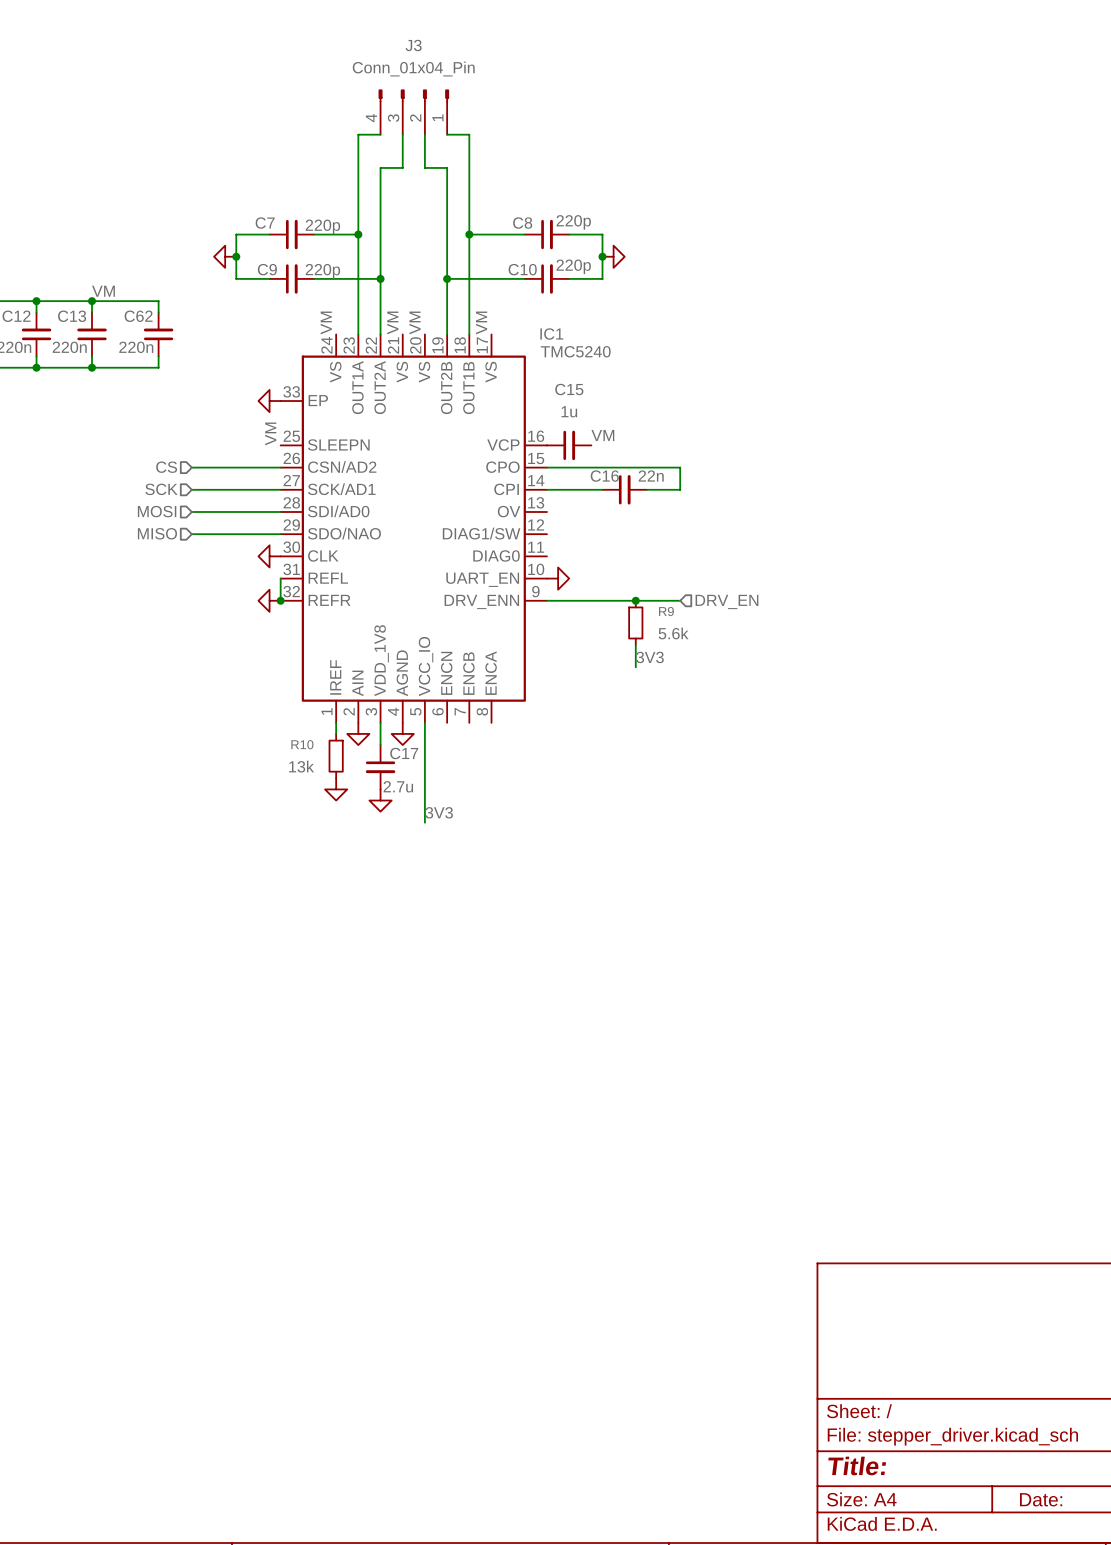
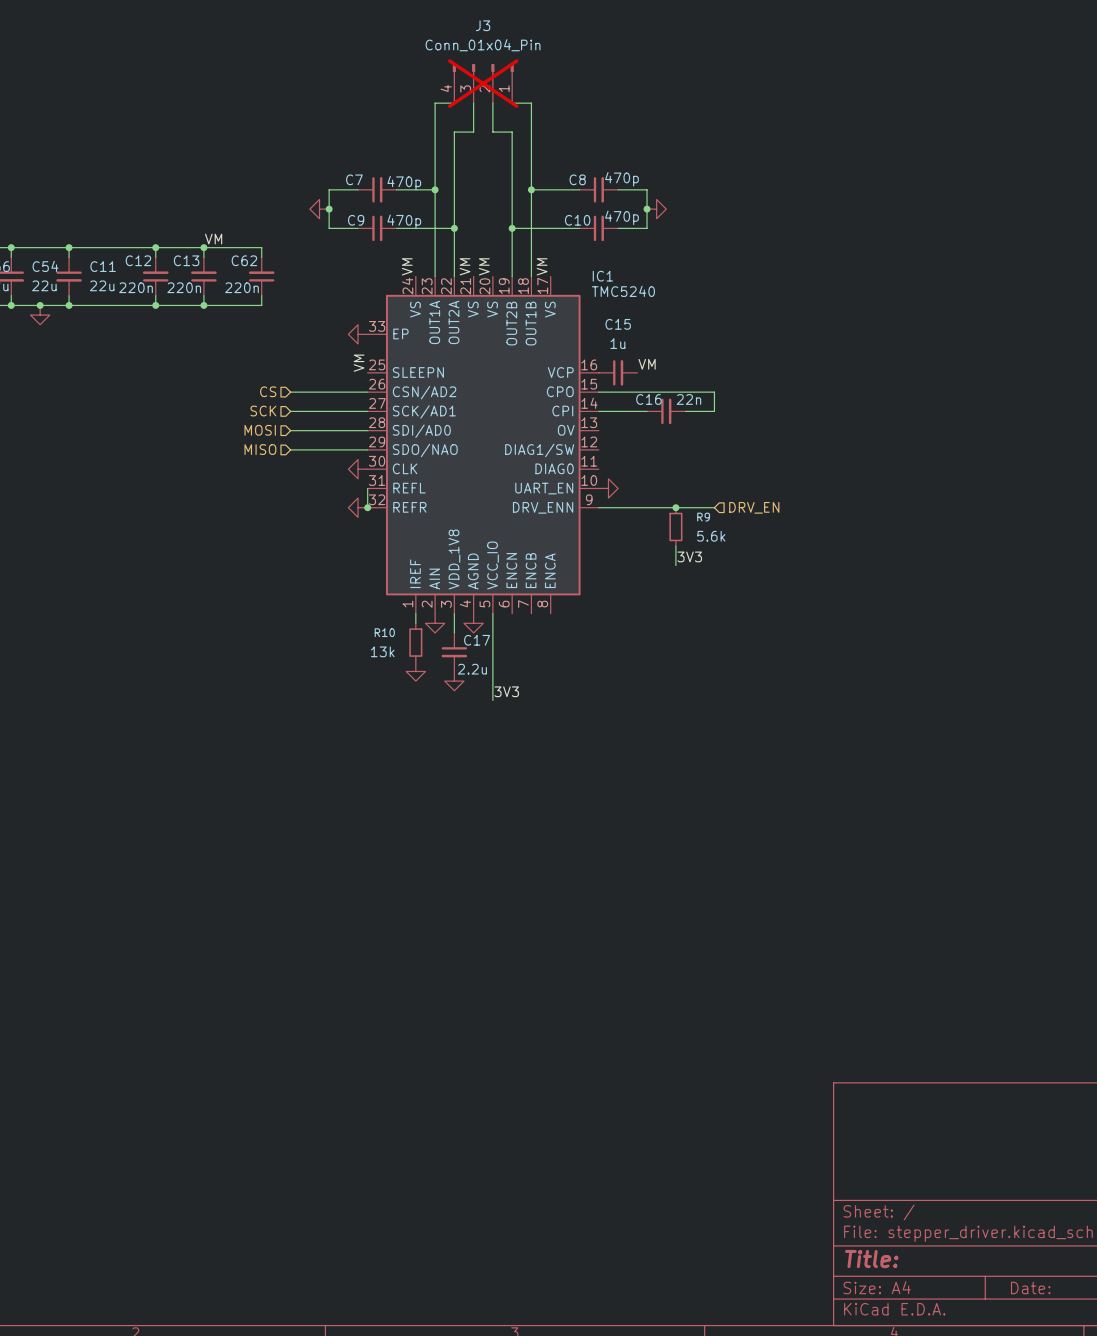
J3 do-not-place cross: none -> (483, 83)
C8 value: 220p (573, 222) -> 470p (621, 179)
C7 value: 220p (322, 226) -> 470p (404, 183)
C10 value: 220p (573, 266) -> 470p (621, 217)
C9 value: 220p (322, 271) -> 470p (404, 221)
C17 value: 2.7u (398, 786) -> 2.2u (472, 669)

